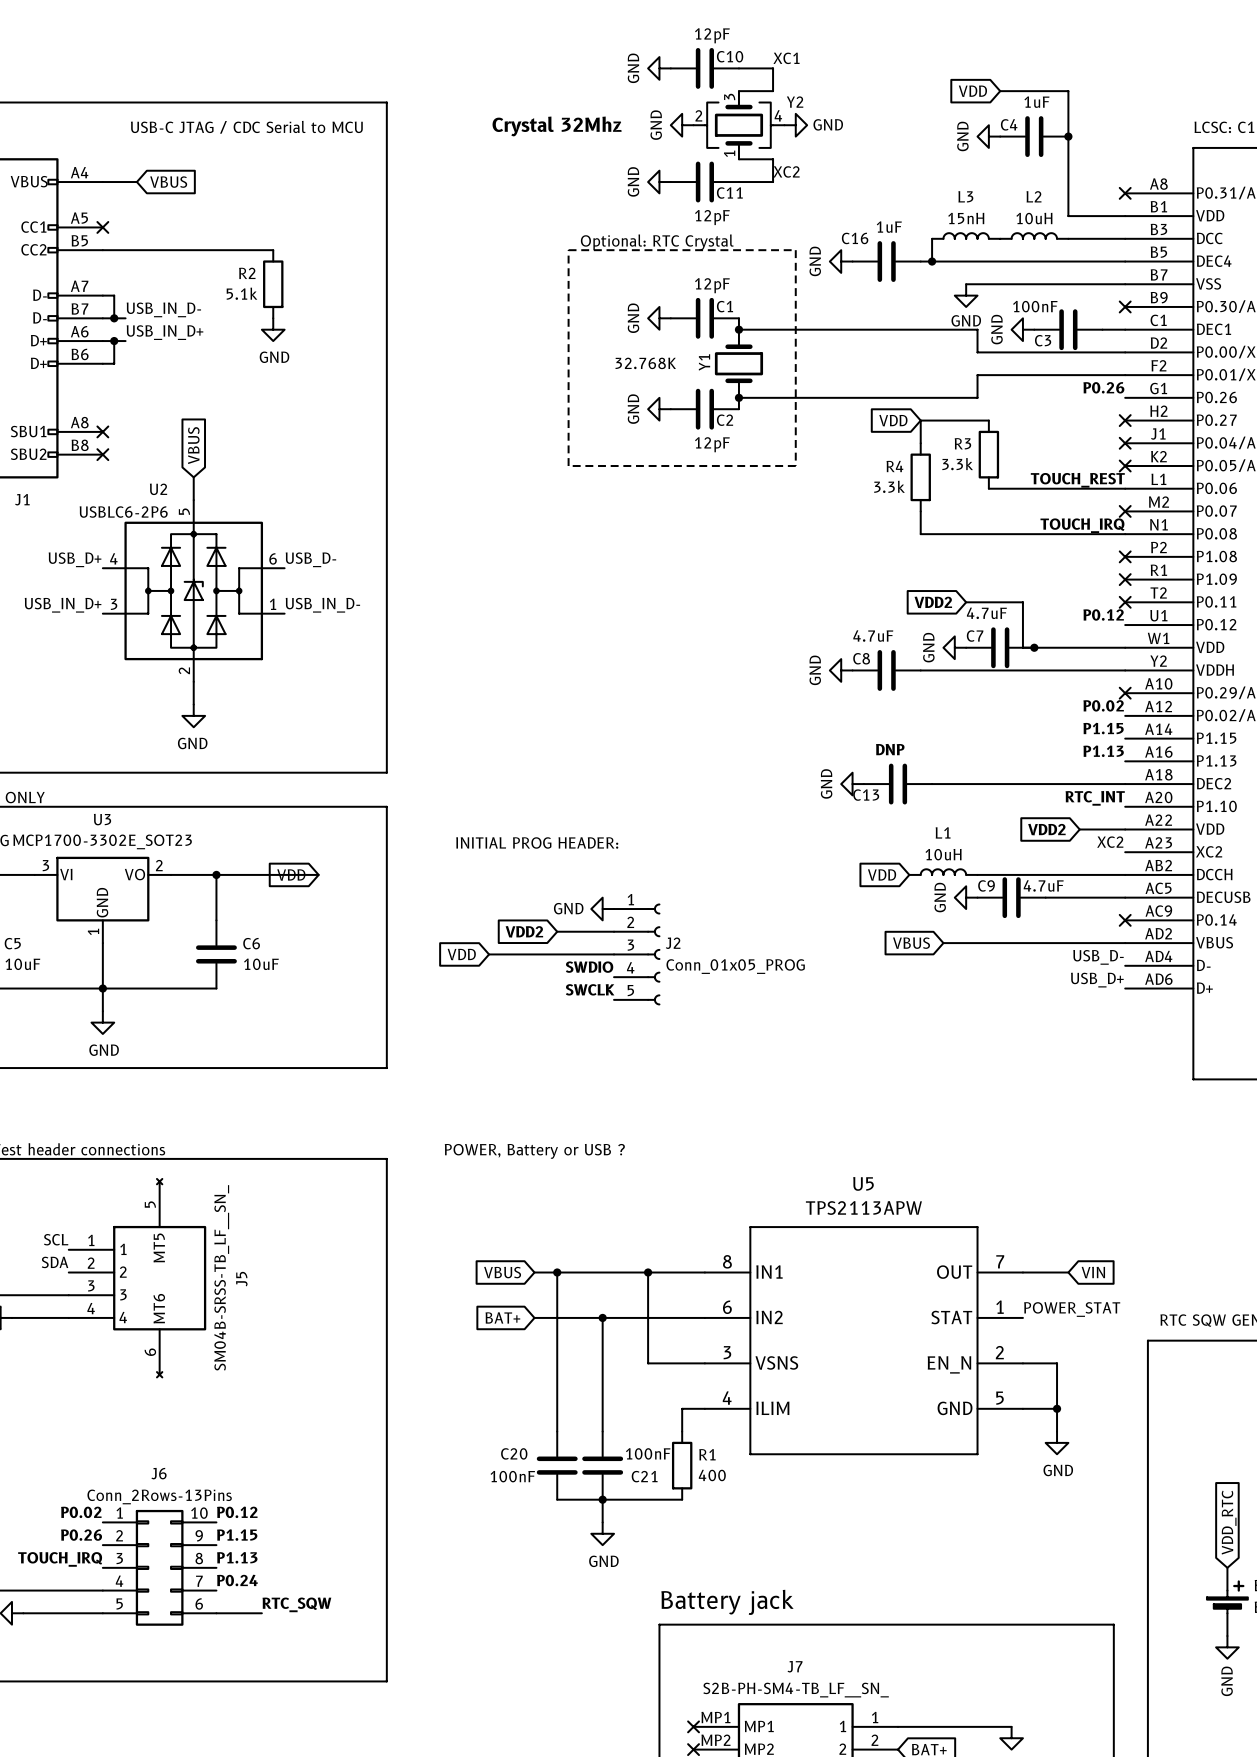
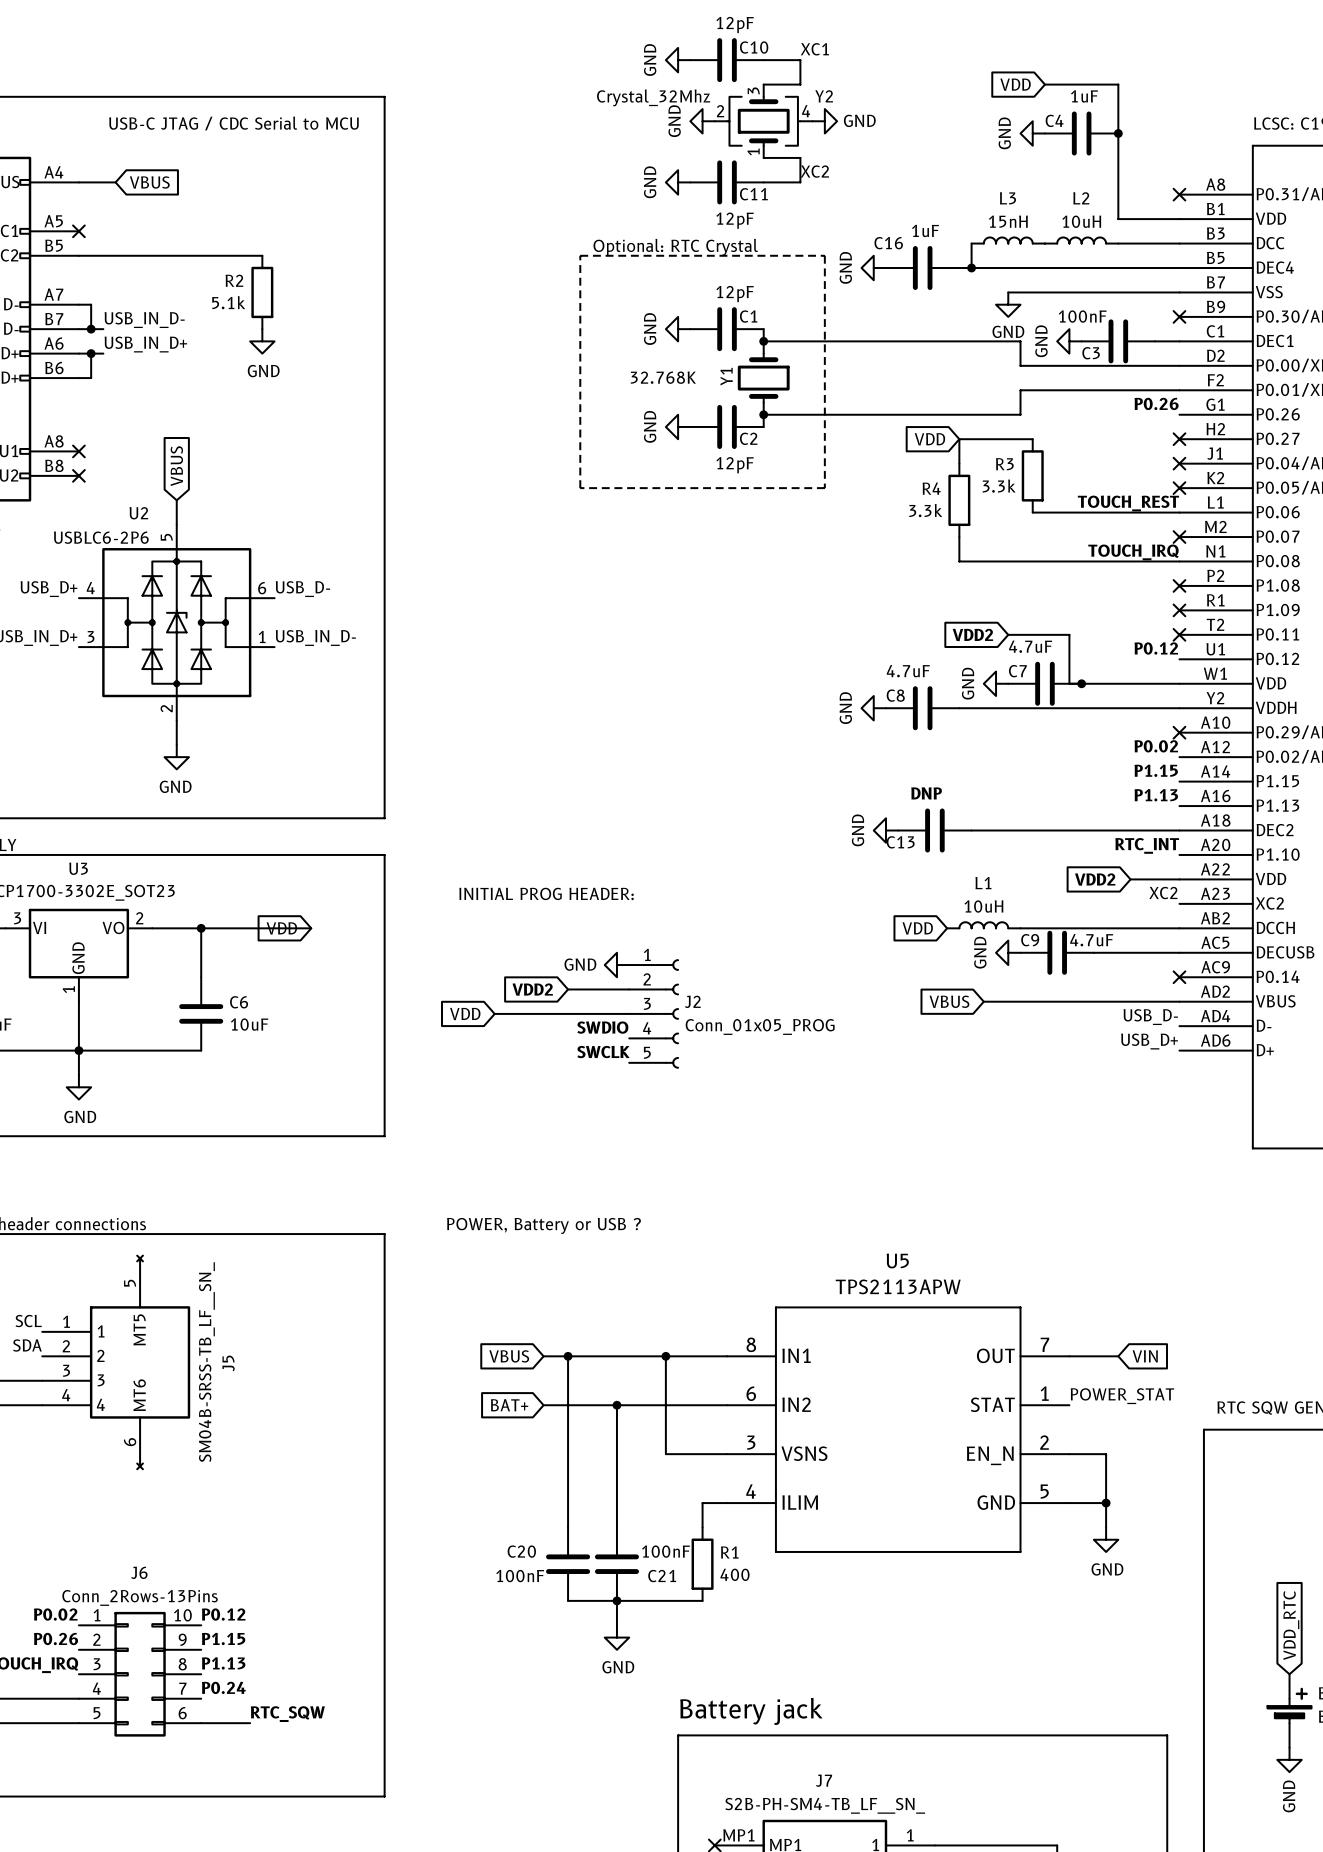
Y2 value: Crystal 32Mhz (557, 126) -> Crystal_32Mhz (653, 97)

